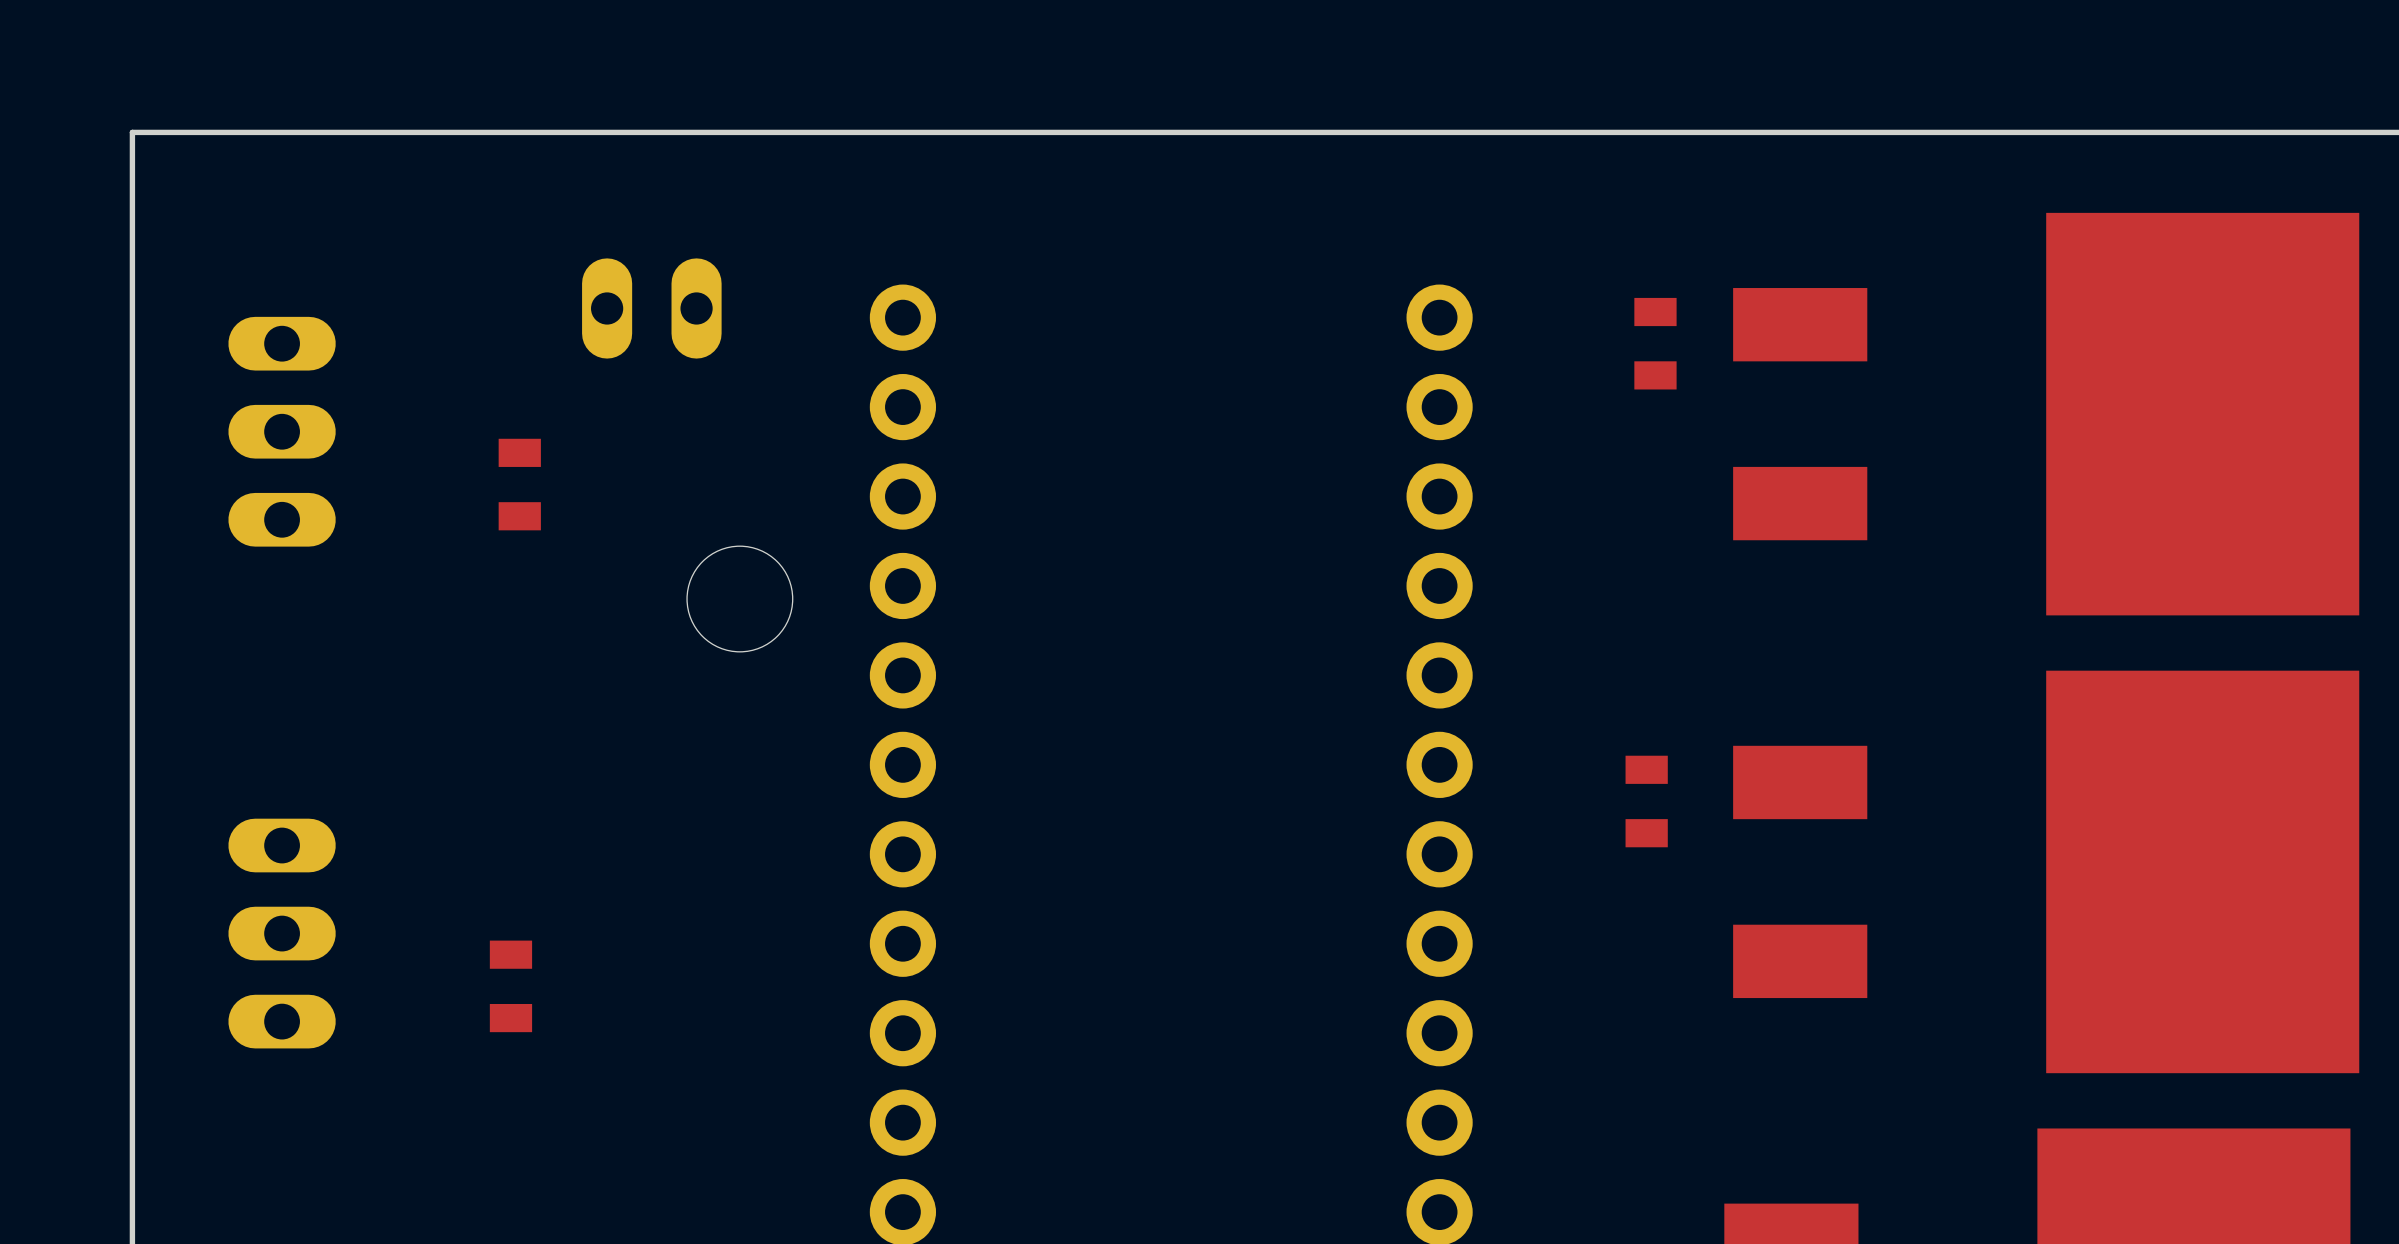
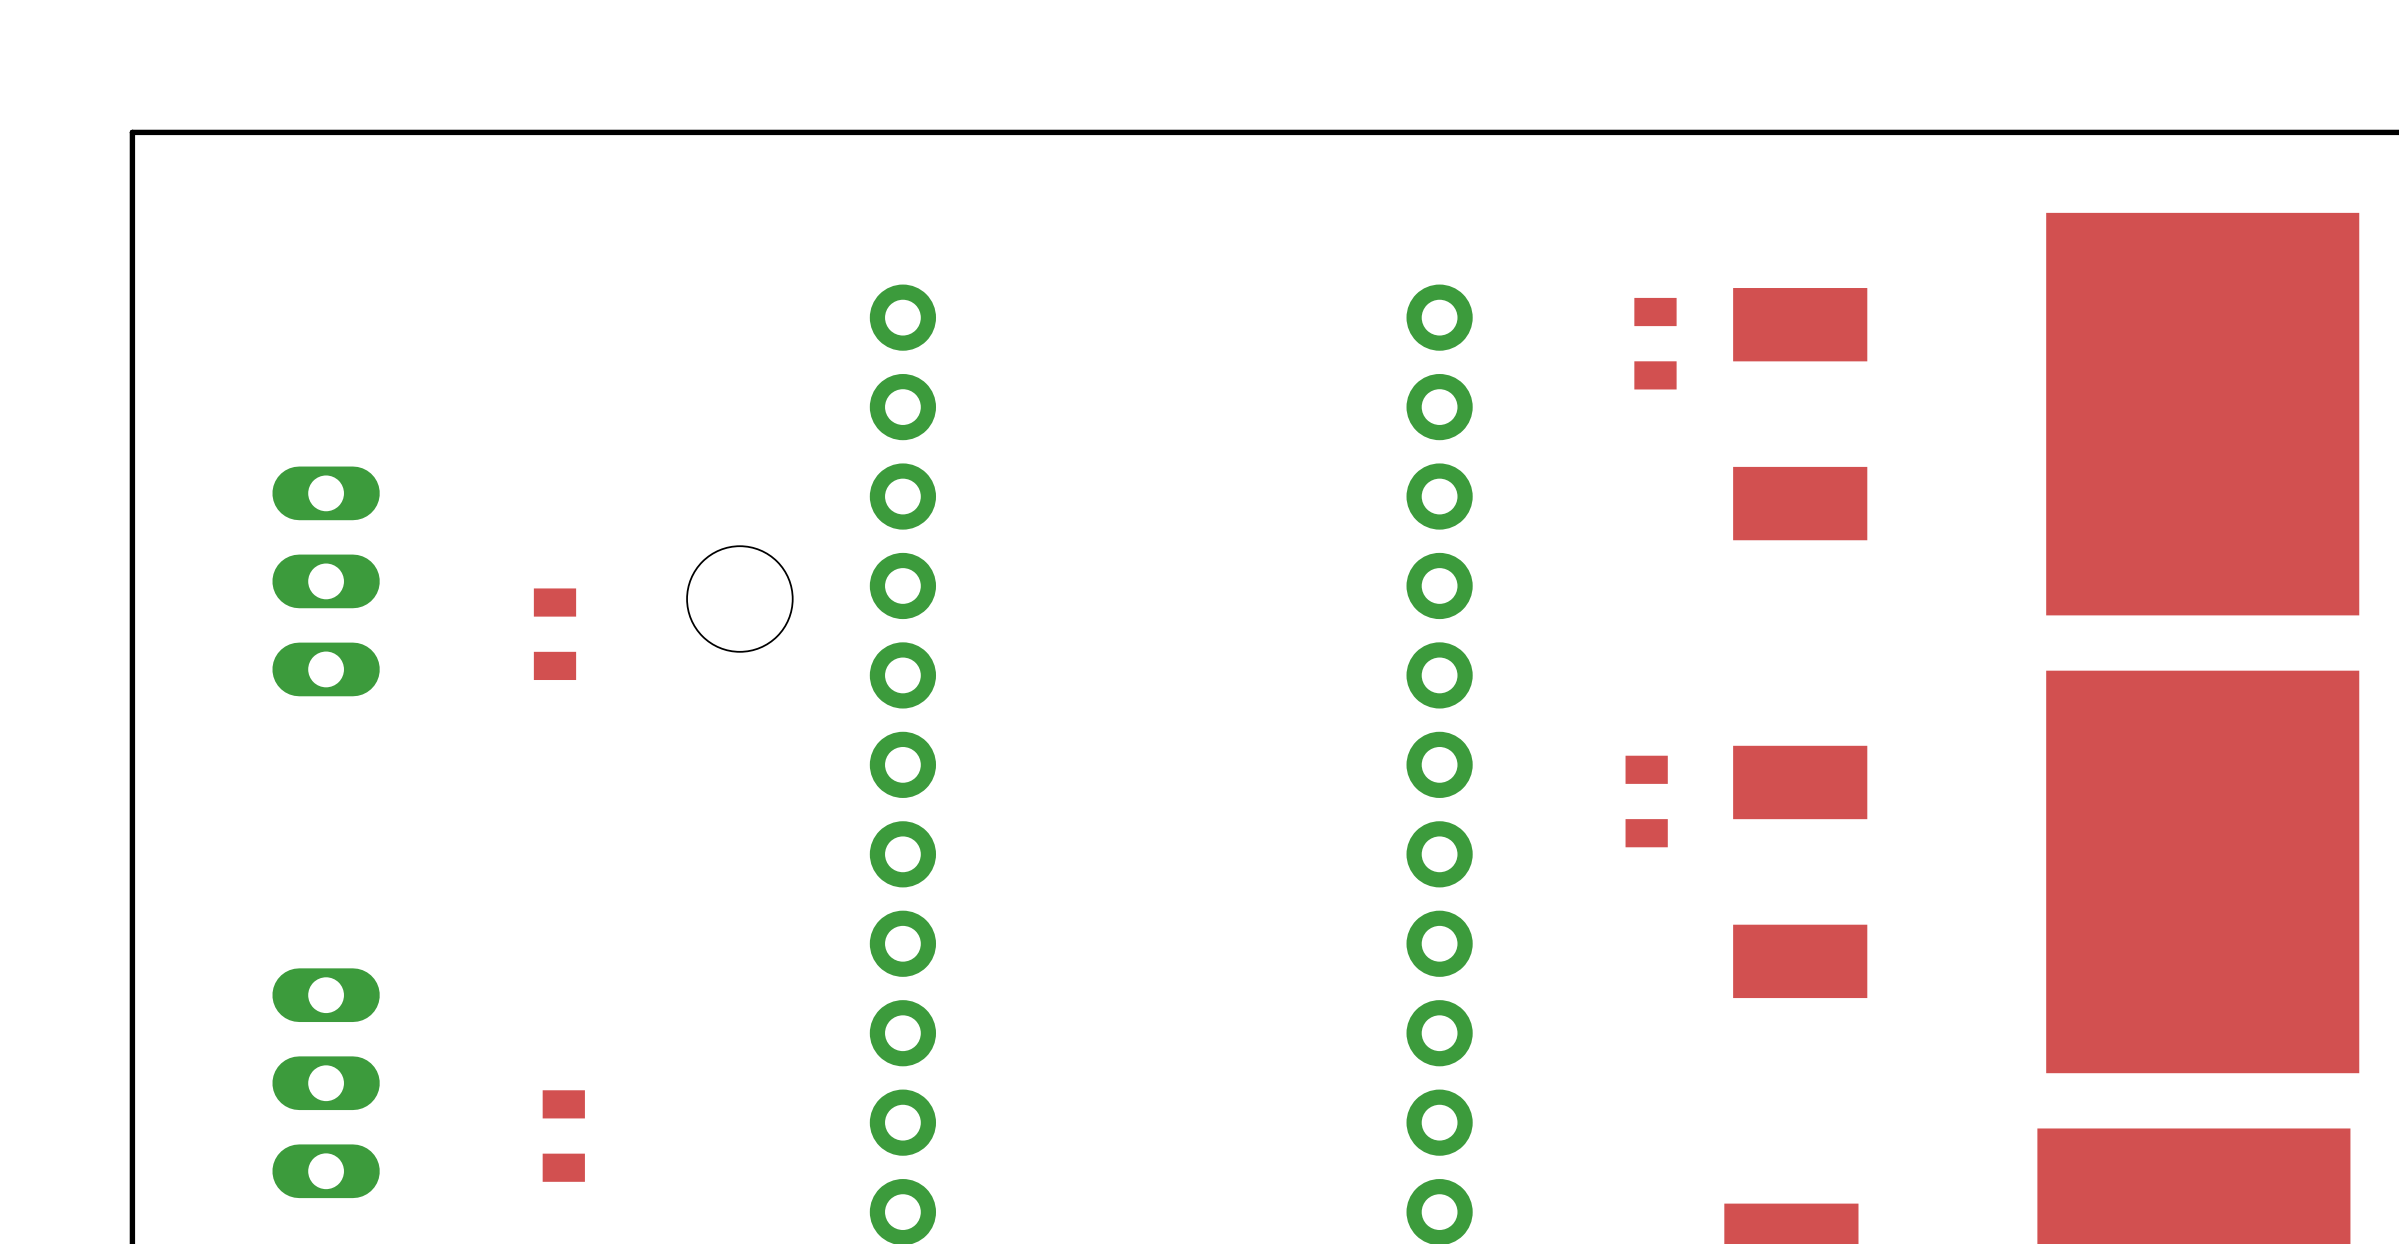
part: (651, 308) -> none
part position: (282, 431) -> (326, 581)
part position: (519, 484) -> (554, 634)
part position: (282, 933) -> (326, 1083)
part position: (510, 986) -> (563, 1136)

